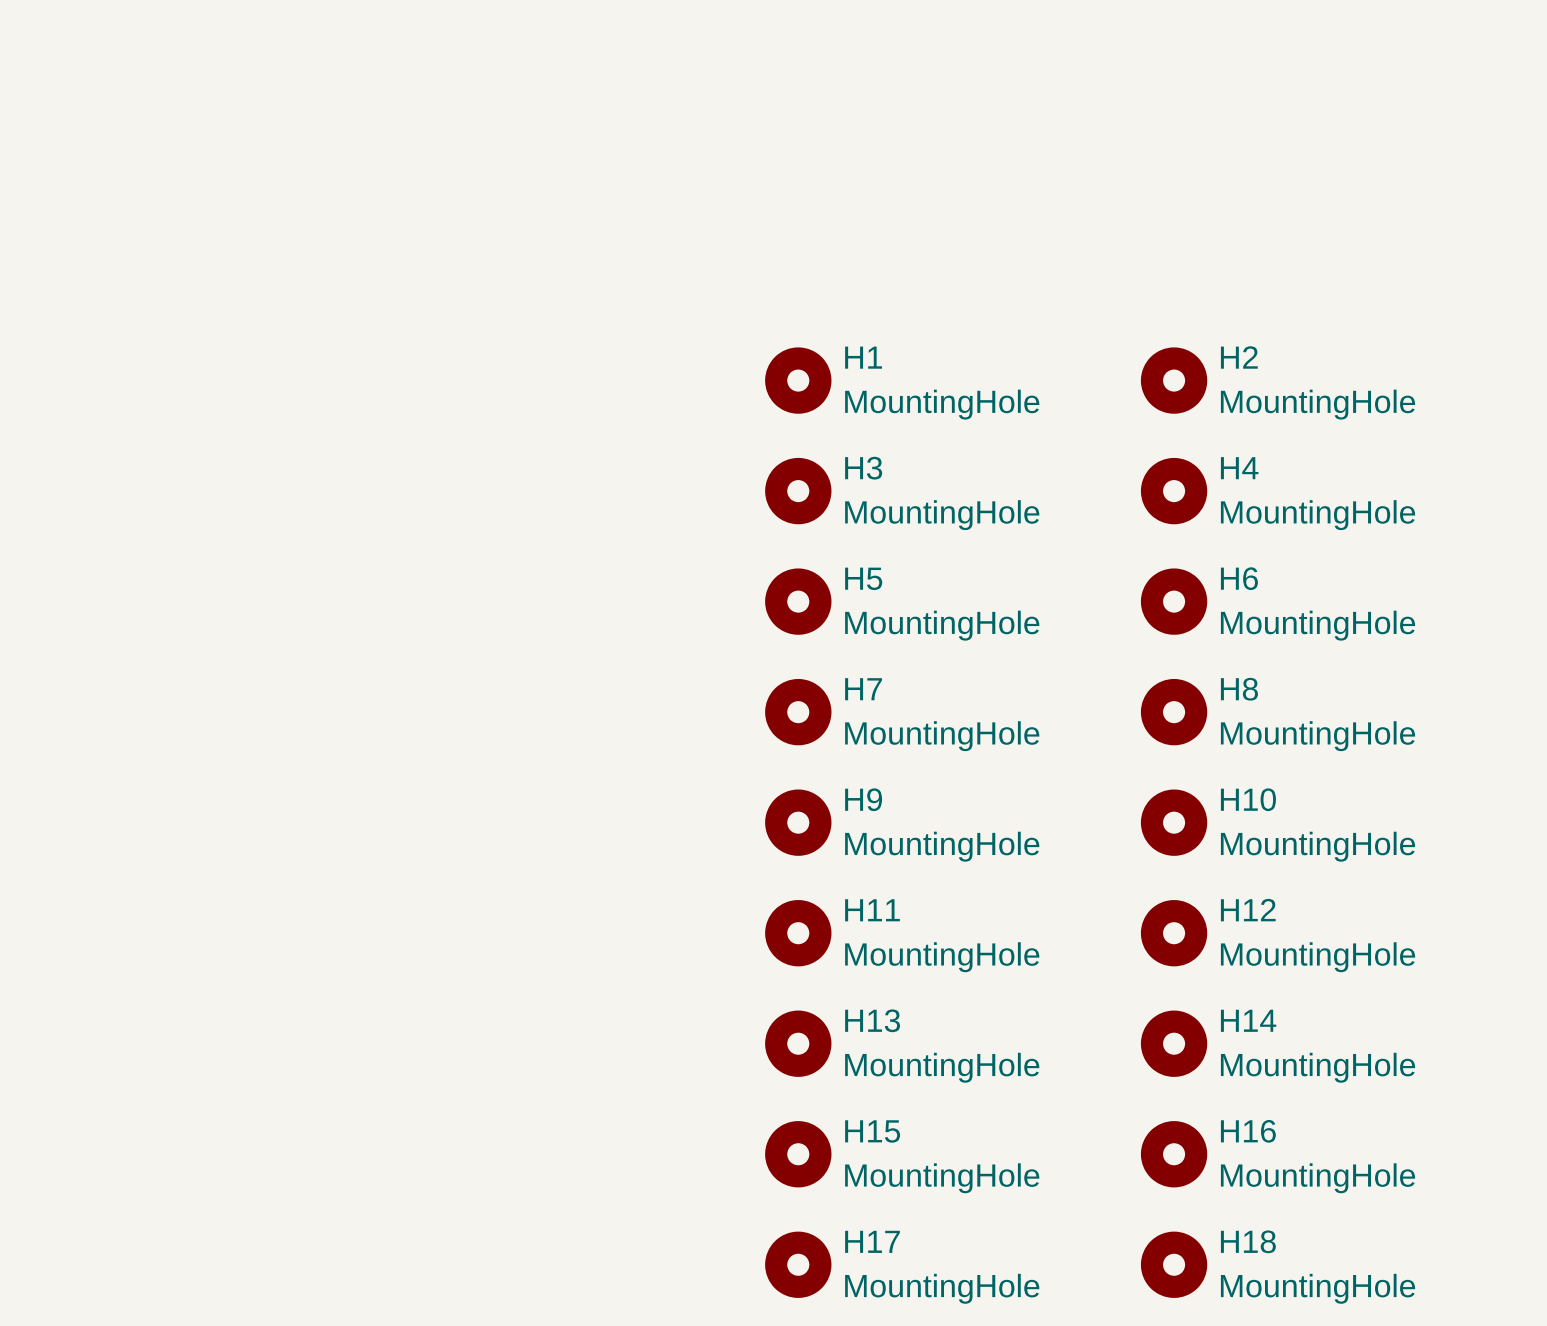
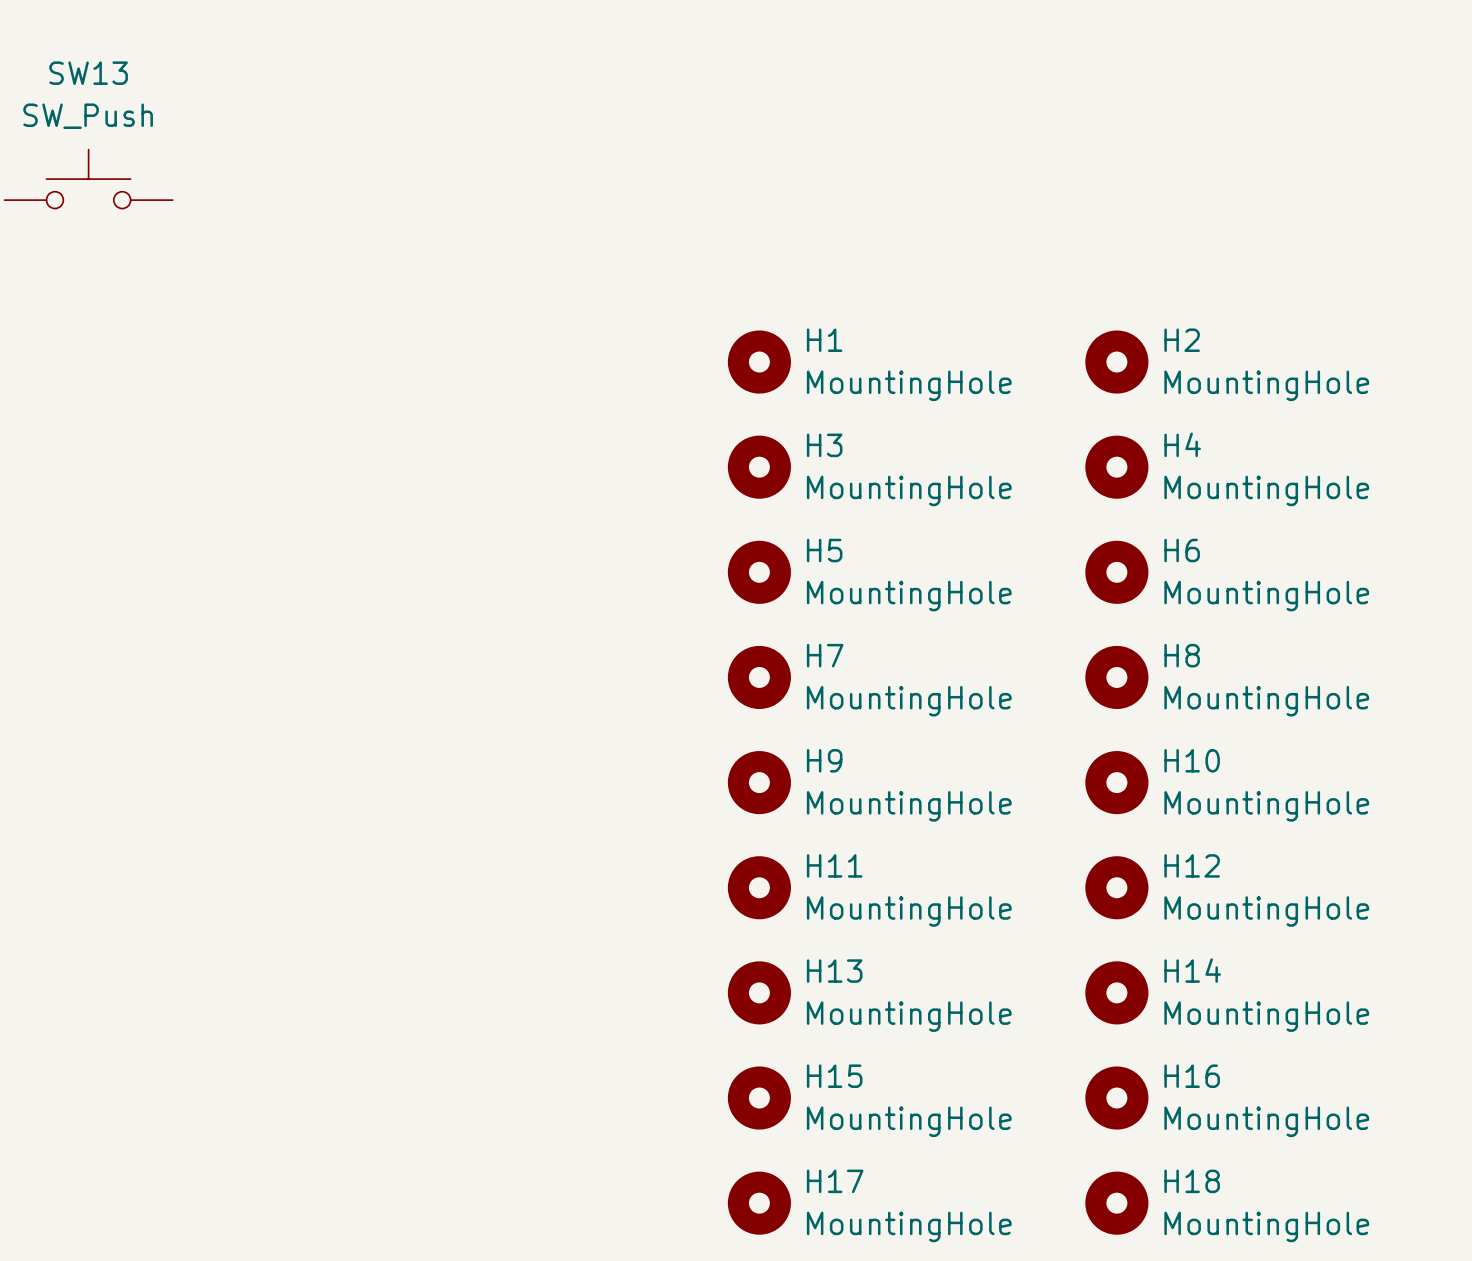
SW13: none -> SW_Push (88, 179)

